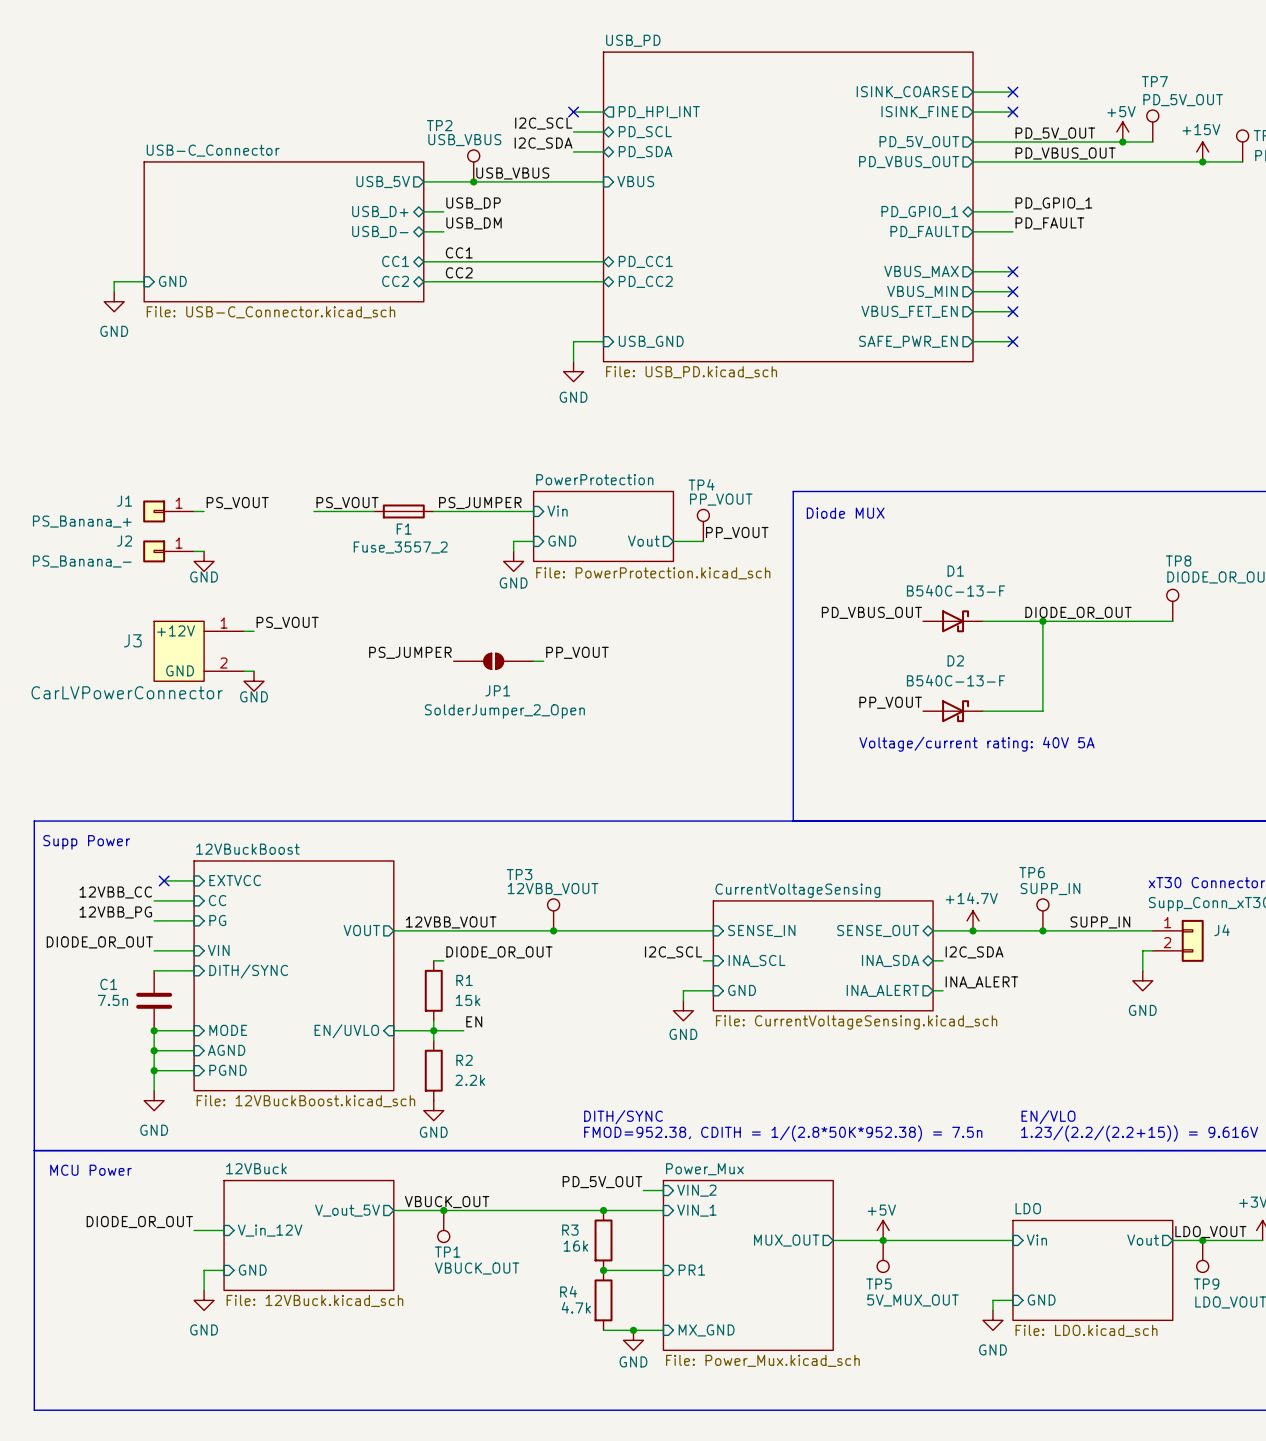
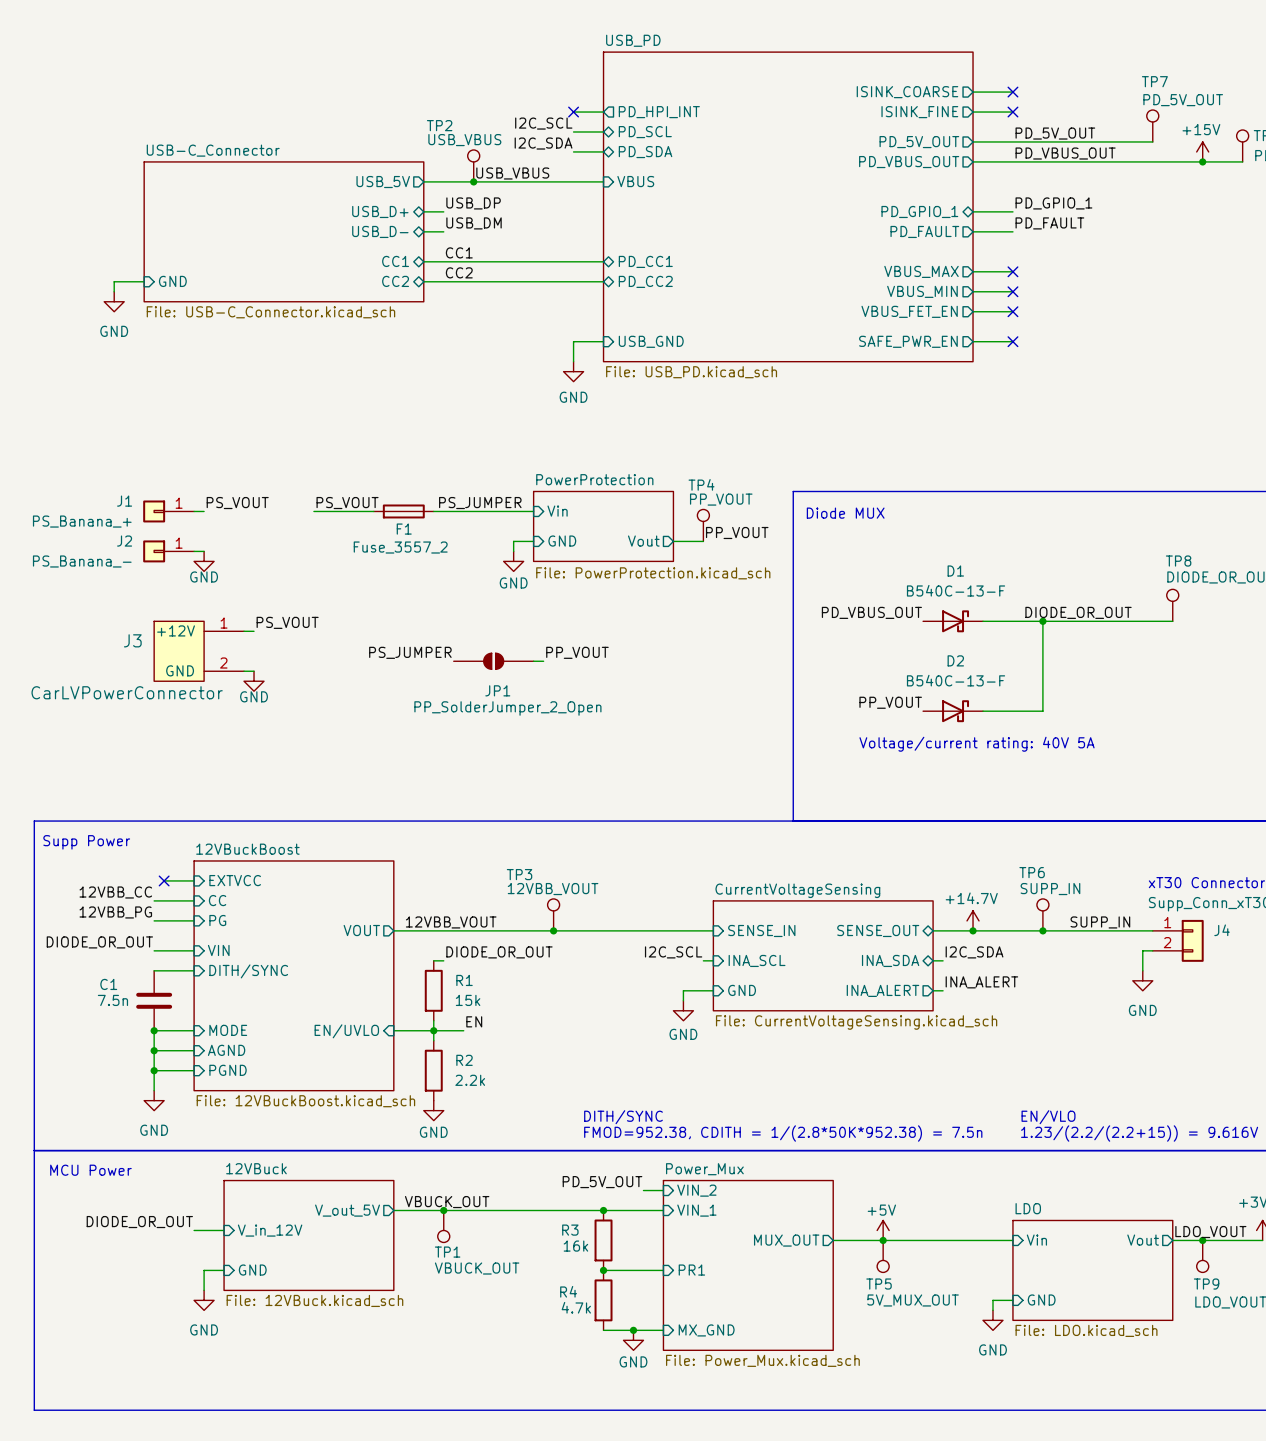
power symbol: +5V (1122, 131) -> none
junction: (1122, 141) -> none
JP1 value: SolderJumper_2_Open (504, 711) -> PP_SolderJumper_2_Open (507, 708)

